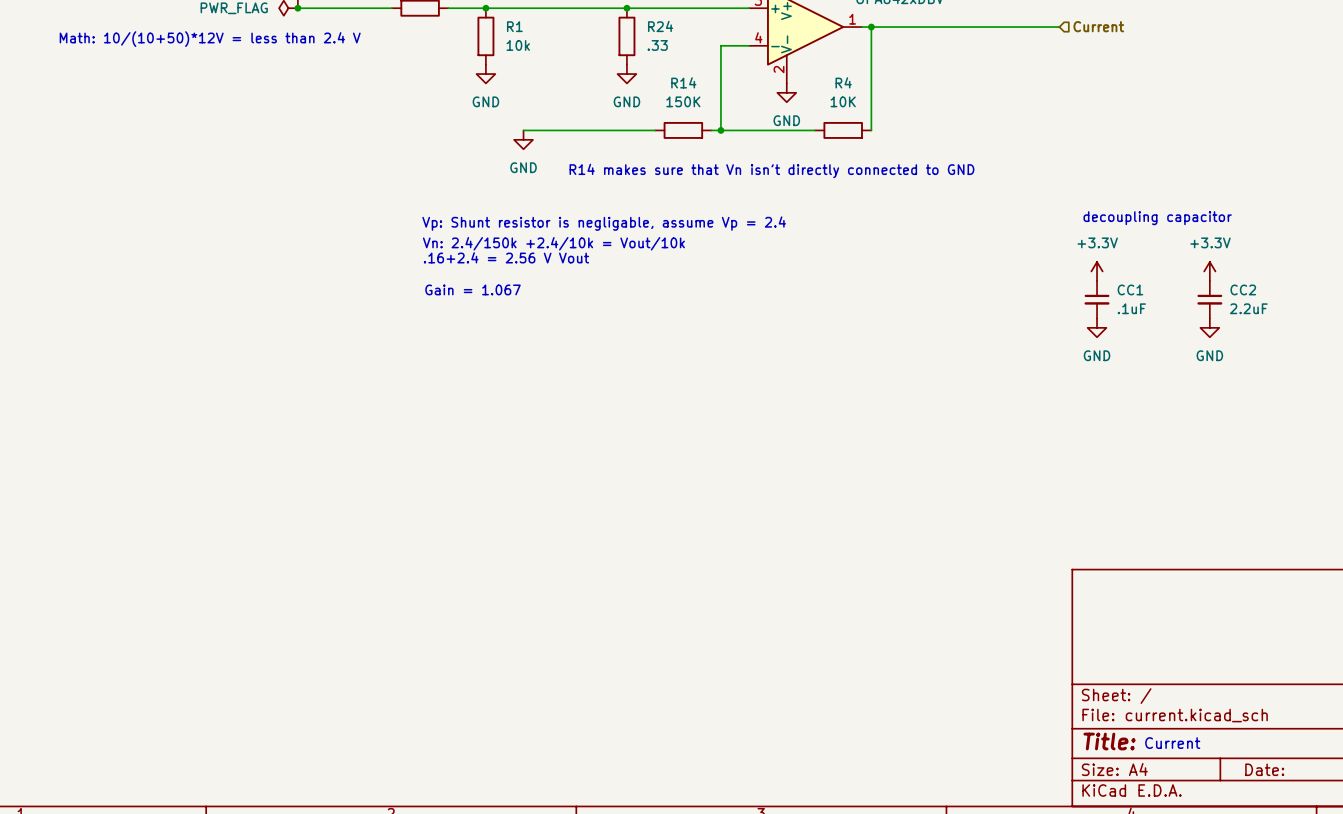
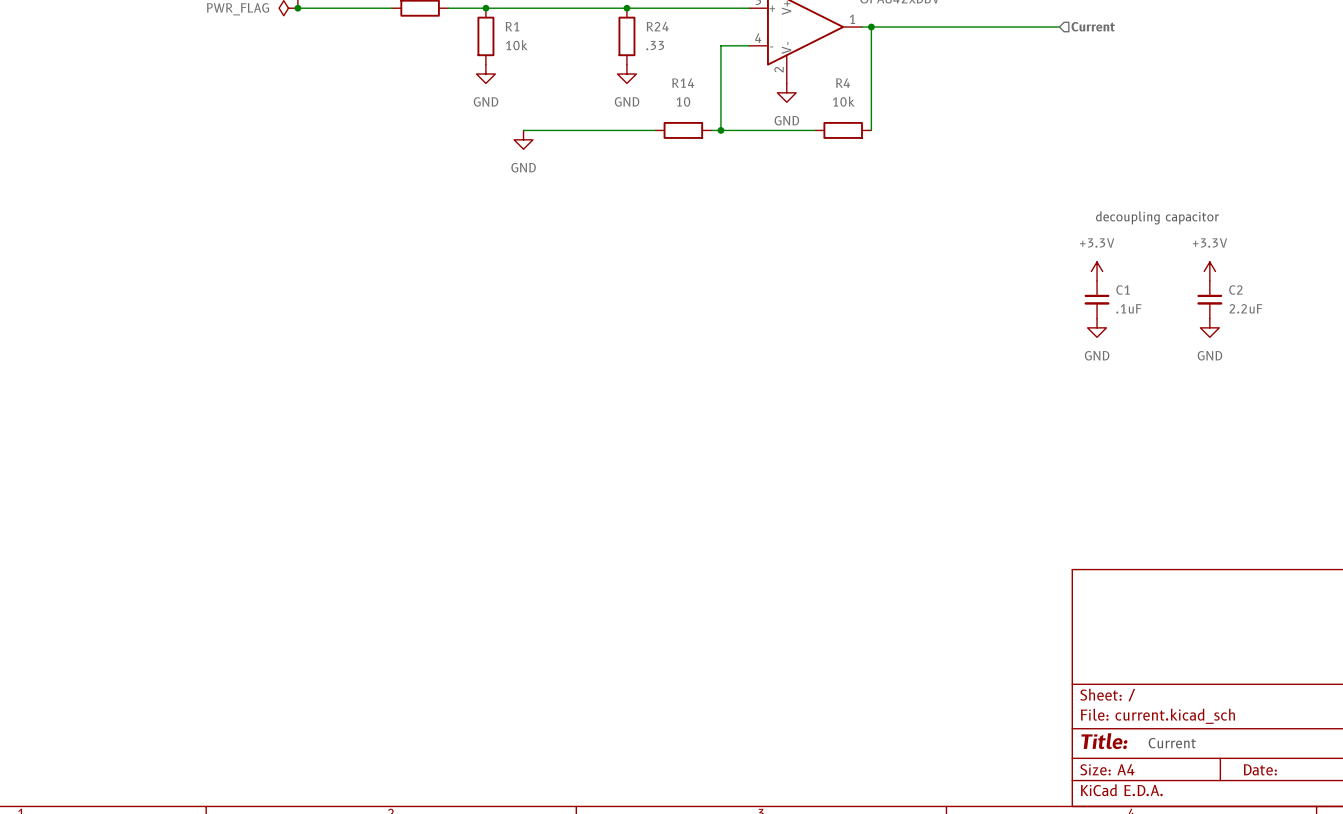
text: Math: 10/(10+50)*12V = less than 2.4 V (210, 39) -> none
R14 value: 150K (683, 101) -> 10 (683, 101)
R4 value: 10K (843, 101) -> 10k (843, 101)
text: R14 makes sure that Vn isn't directly connected to GND (771, 170) -> none
text: Vp: Shunt resistor is negligable, assume Vp = 2.4 (604, 223) -> none
text: Vn: 2.4/150k +2.4/10k = Vout/10k (553, 243) -> none
text: .16+2.4 = 2.56 V Vout (506, 257) -> none
text: Gain = 1.067 (472, 289) -> none
CC1 name: CC1 (1130, 289) -> C1 (1123, 290)
CC2 name: CC2 (1243, 289) -> C2 (1235, 290)

